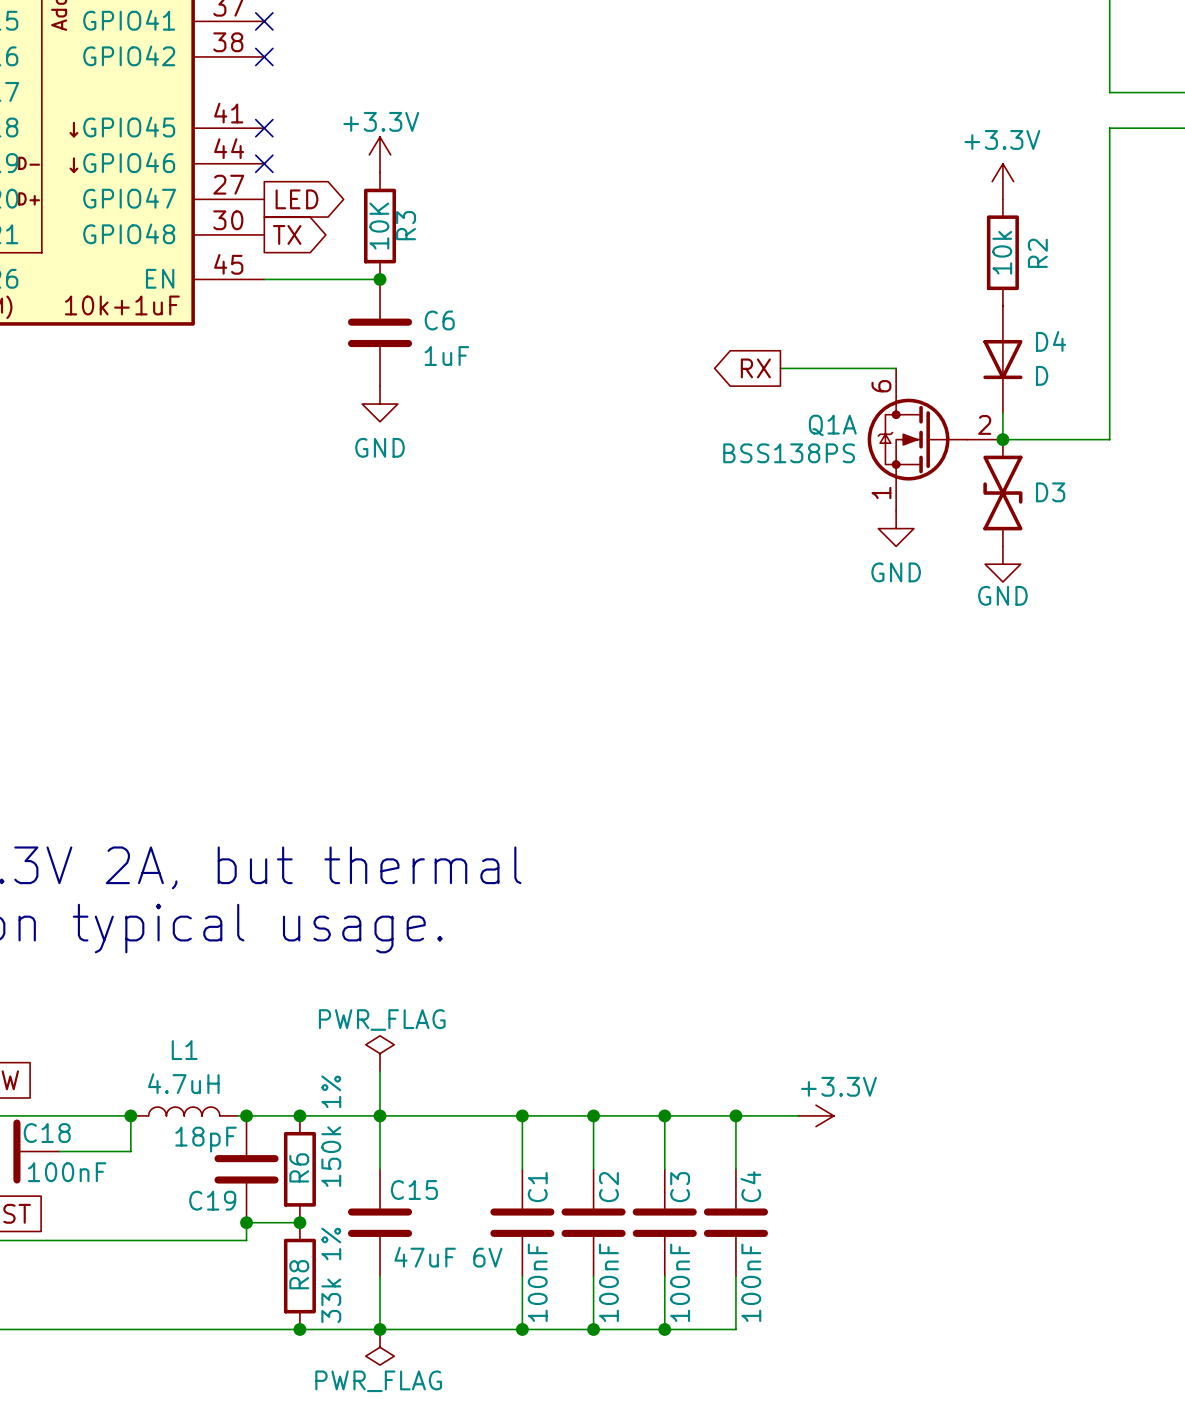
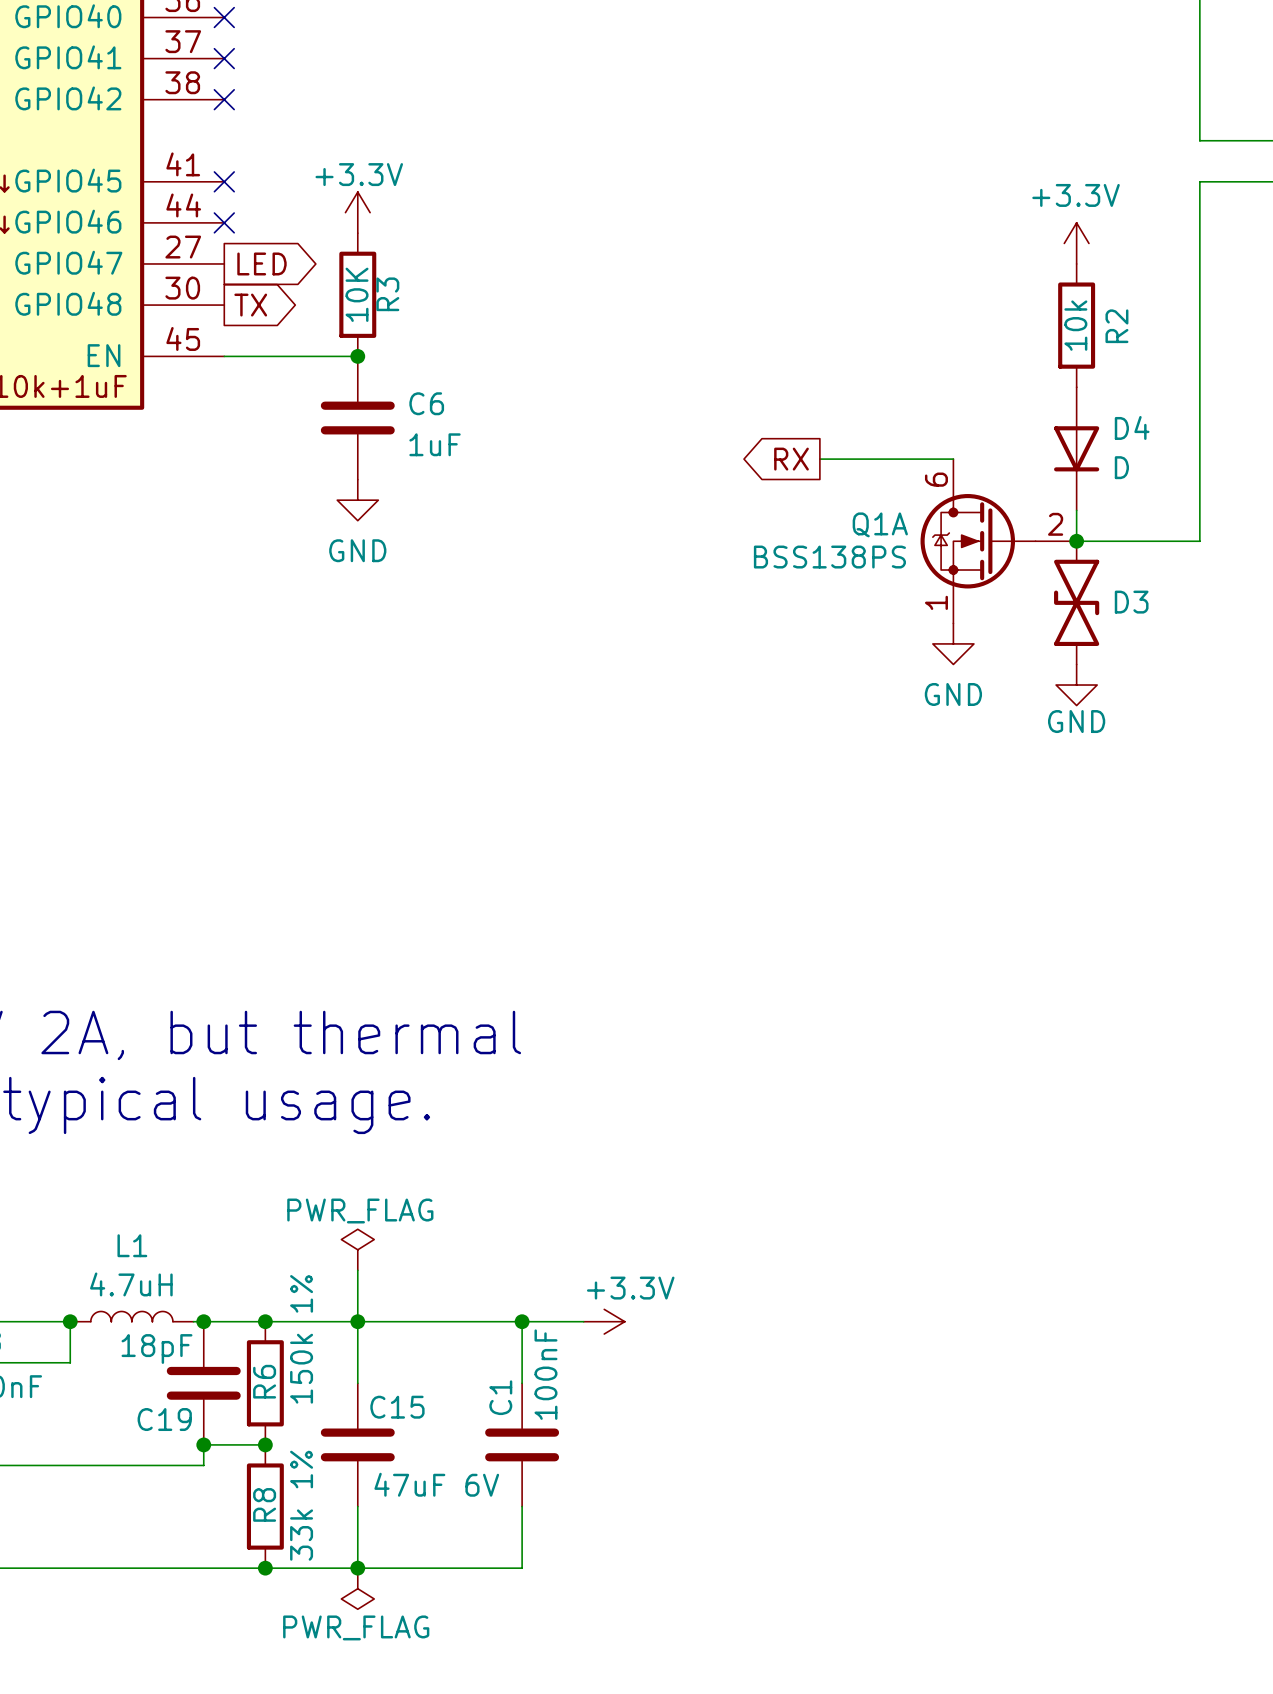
wire: (575, 1115) (798, 1115) -> none
wire: (593, 1115) (593, 1169) -> none
junction: (593, 1115) -> none
wire: (664, 1115) (664, 1169) -> none
junction: (664, 1115) -> none
wire: (735, 1115) (735, 1169) -> none
junction: (735, 1115) -> none
power symbol position: +3.3V (816, 1115) -> +3.3V (604, 1321)
C1 name position: C1 (537, 1187) -> C1 (500, 1397)
C2: 100nF (593, 1222) -> none
C3: 100nF (664, 1222) -> none
C4: 100nF (735, 1222) -> none
wire: (593, 1276) (593, 1329) -> none
wire: (664, 1276) (664, 1329) -> none
wire: (735, 1276) (735, 1329) (522, 1329) -> none
C1 value position: 100nF (537, 1282) -> 100nF (545, 1374)
junction: (522, 1329) -> none
junction: (593, 1329) -> none
junction: (664, 1329) -> none

